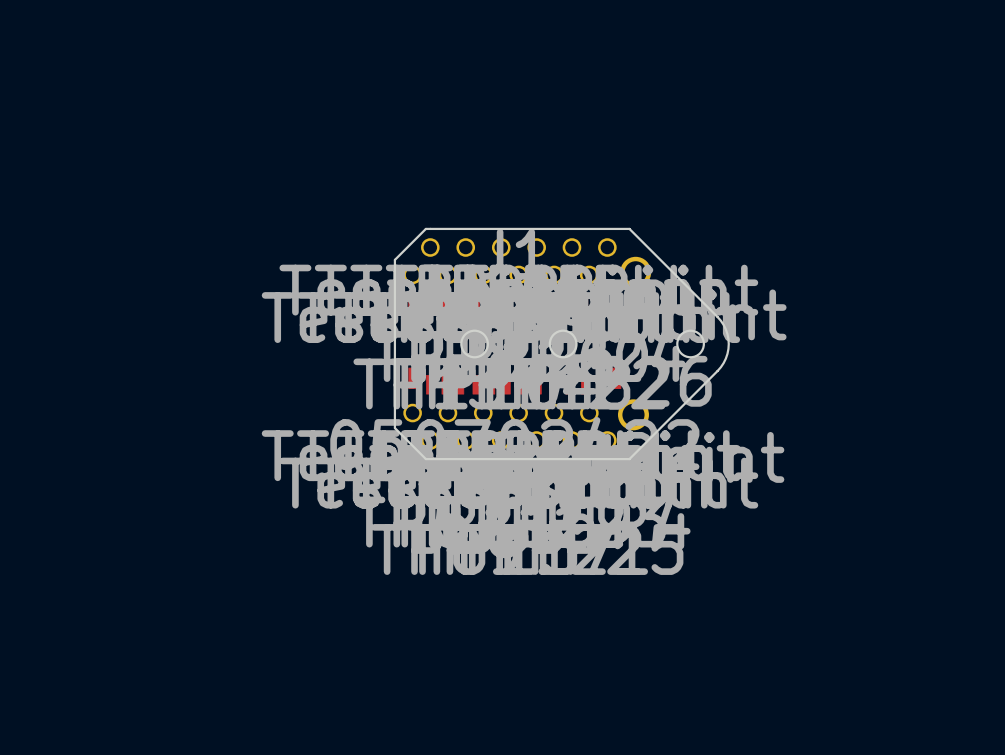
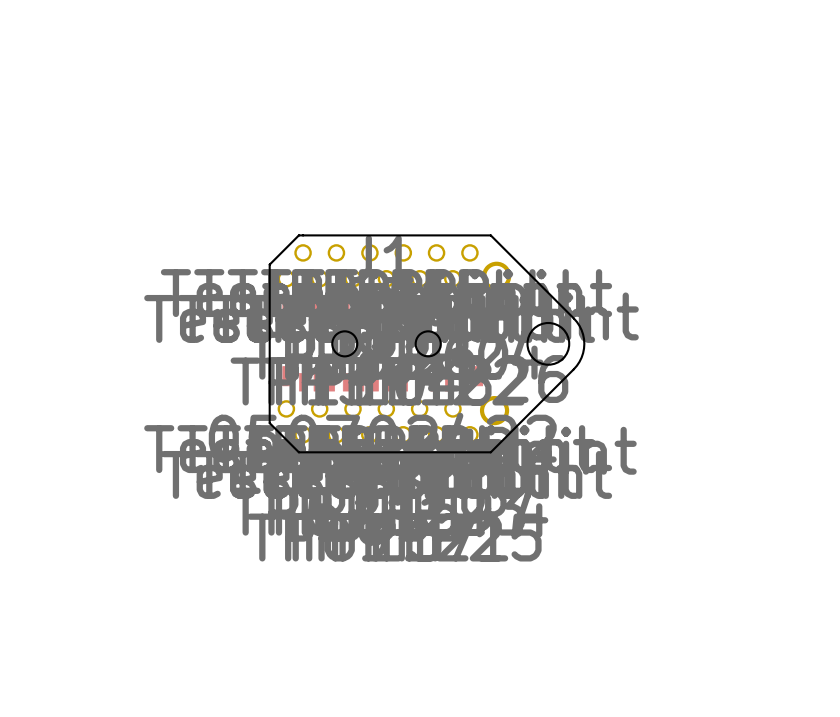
round board edge size: [676, 329, 705, 359] -> [526, 321, 571, 366]

